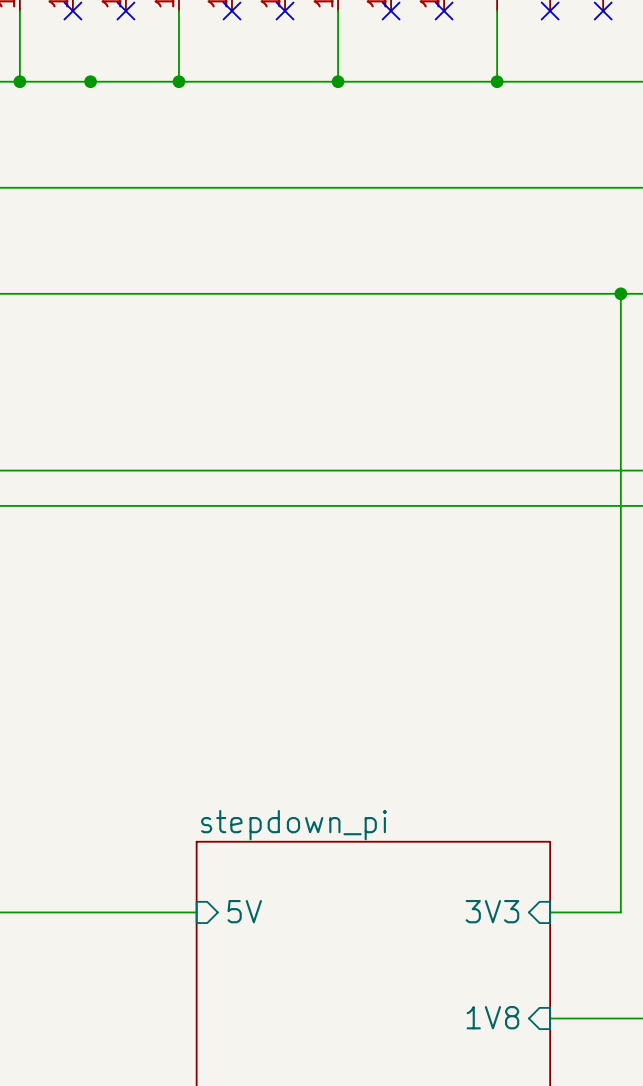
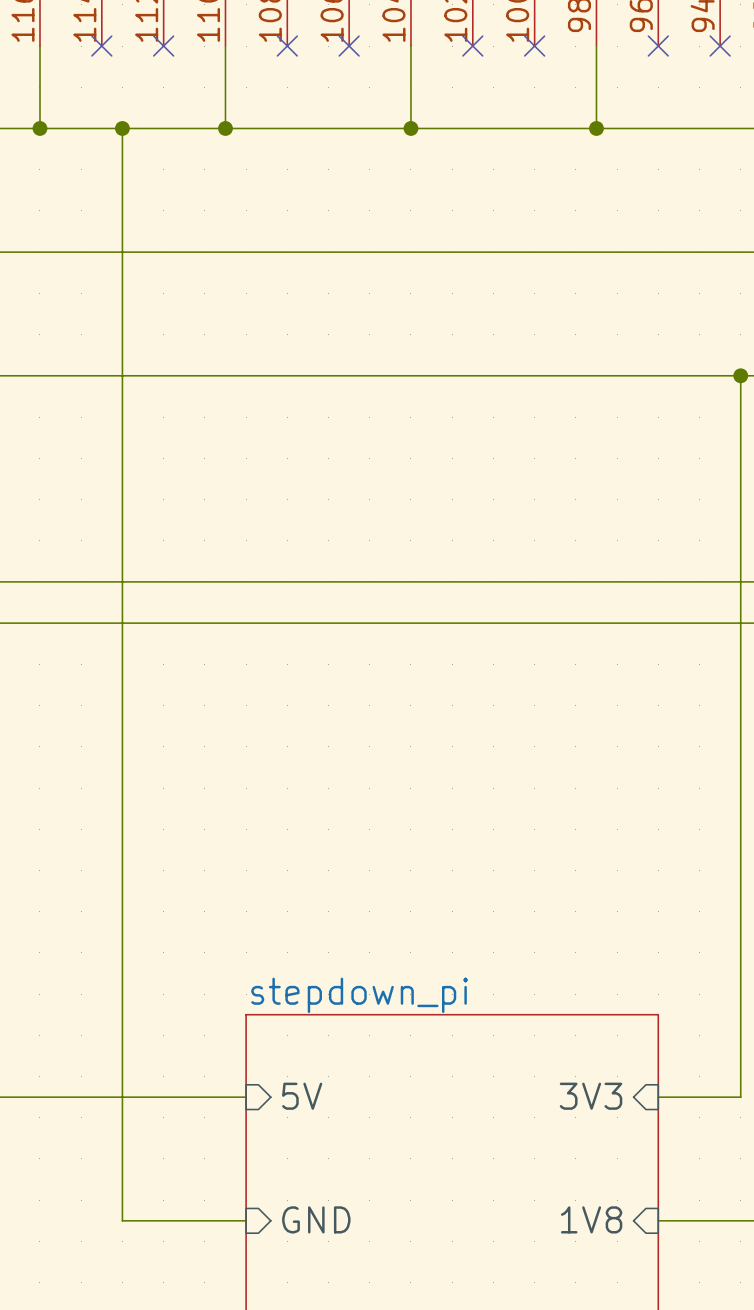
wire: none -> (122, 128) (122, 1220) (246, 1220)
sheet pin: none -> GND (316, 1219)

